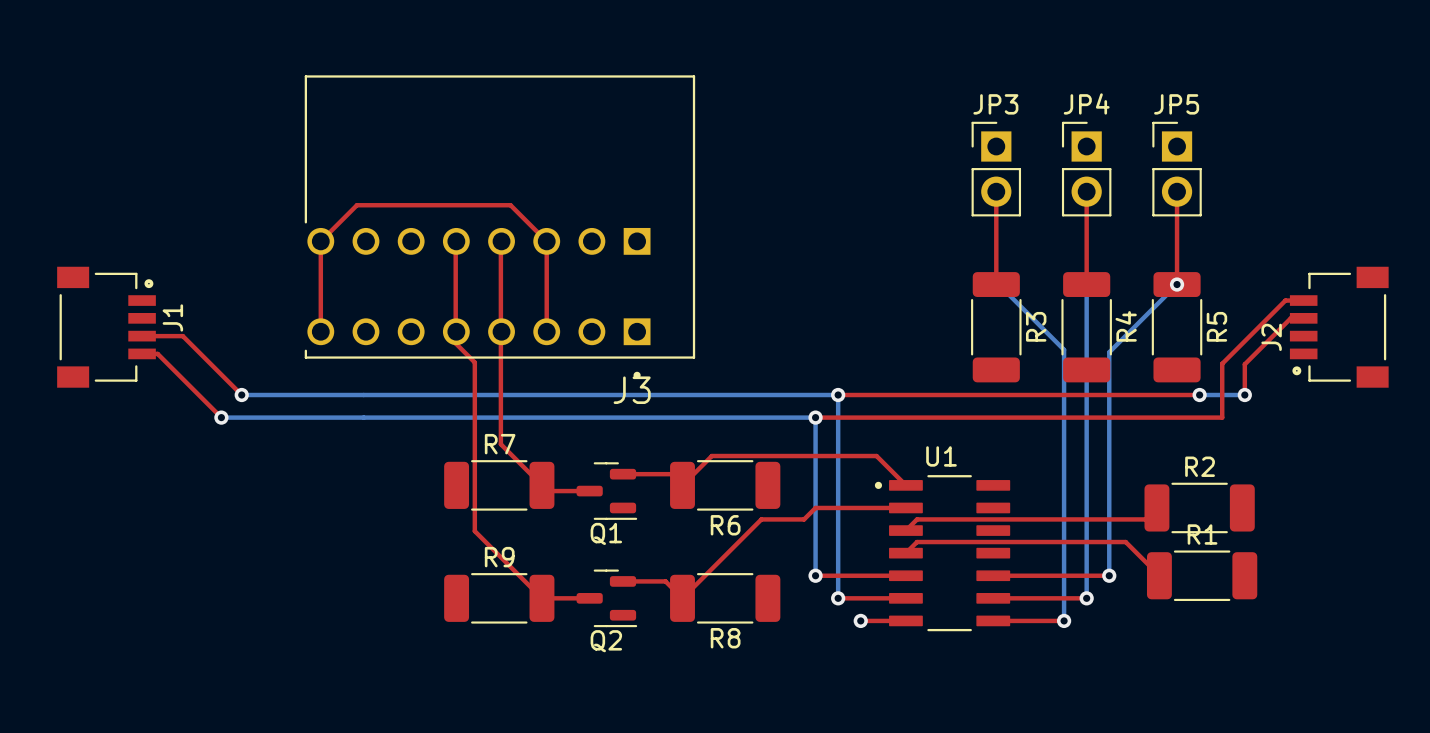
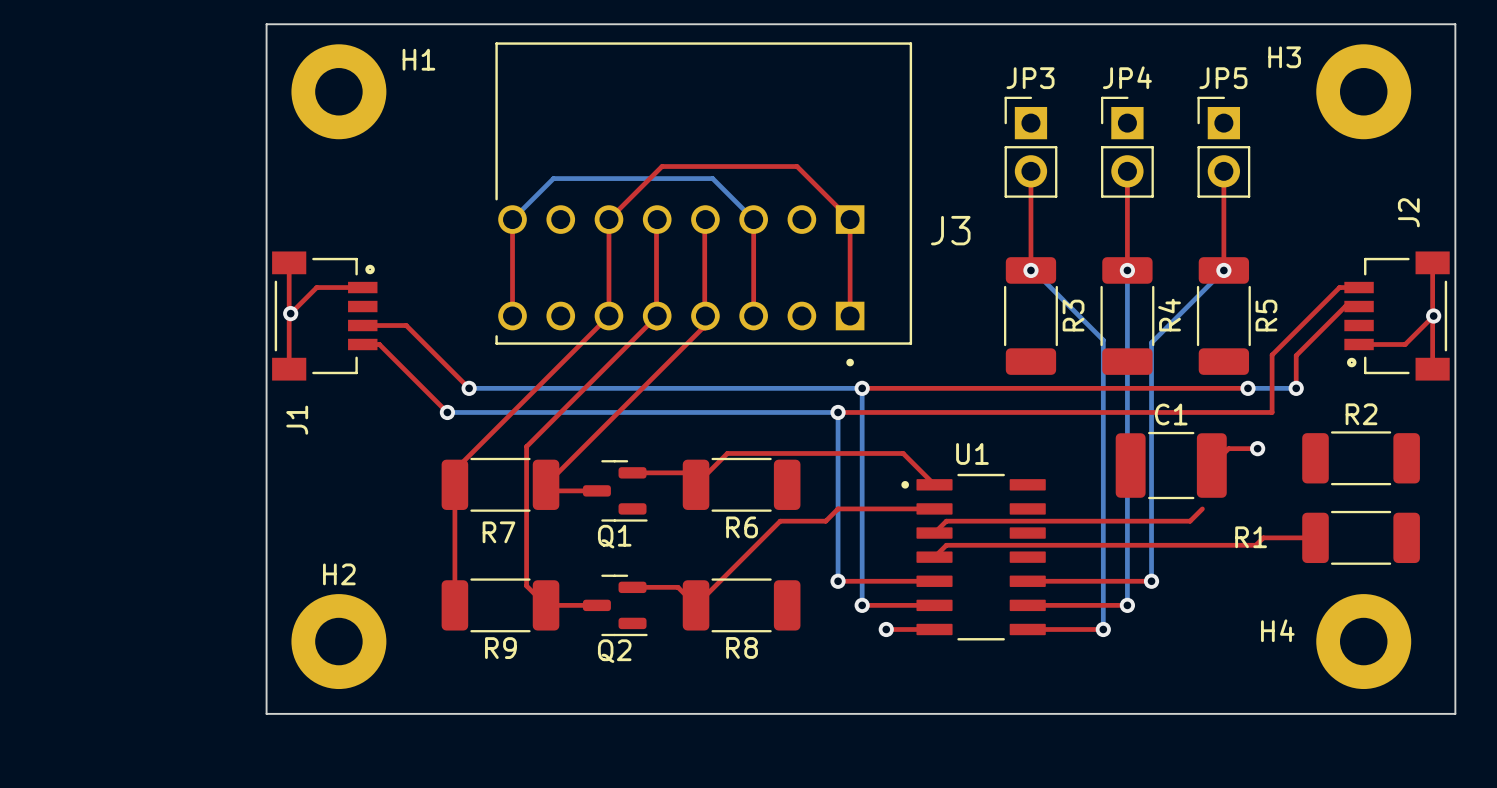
board edge: none -> (266, 24) (1455, 24) (1455, 713) (266, 713) (266, 24)
H1: none -> (338, 91)
H3: none -> (1363, 91)
J3 position: (499, 227) -> (703, 204)
top track: none -> (512, 219) (512, 316)
bottom track: none -> (512, 219) (553, 178) (712, 178) (753, 219)
top track: none -> (753, 219) (753, 316)
top track: none -> (656, 231) (656, 328)
top track: none -> (704, 231) (704, 328)
top track: (455, 253) (455, 343) (474, 362) (474, 531) (523, 580) -> (657, 316) (526, 446) (526, 585)
top track: (500, 253) (500, 444) (541, 485) -> (705, 316) (705, 325) (546, 484)
top track: none -> (289, 262) (290, 313)
top track: none -> (1432, 262) (1433, 316) (1405, 344) (1359, 344)
via: none -> (1030, 270)
via: none -> (1127, 270)
top track: none -> (362, 287) (316, 287) (289, 315) (289, 369)
J1 name position: J1 (172, 317) -> J1 (297, 420)
via: none -> (290, 313)
J1 position: (106, 327) -> (324, 316)
top track: none -> (850, 316) (850, 219) (797, 166) (662, 166) (608, 219) (608, 316) (454, 470) (454, 605)
via: none -> (1433, 316)
top track: none -> (1432, 317) (1432, 369)
top track: (320, 331) (320, 241) (356, 205) (510, 205) (546, 241) (546, 331) -> none
top track: (142, 336) (182, 336) (241, 395) -> (362, 325) (406, 325) (469, 388)
J2 name position: J2 (1271, 337) -> J2 (1408, 212)
top track: (142, 353) (157, 353) (221, 417) -> (362, 344) (379, 344) (447, 412)
J3 name position: J3 (632, 390) -> J3 (950, 230)
bottom track: (241, 395) (469, 395) -> none
via: (241, 395) -> none
via: none -> (469, 388)
bottom track: (221, 417) (449, 417) -> none
via: (221, 417) -> none
via: none -> (447, 412)
R7 name position: R7 (500, 444) -> R7 (498, 532)
top track: none -> (1257, 448) (1228, 448) (1211, 465)
via: none -> (1257, 448)
C1: none -> (1171, 465)
R2 position: (1199, 507) -> (1361, 458)
top track: (1125, 542) (1159, 575) -> (1169, 545) (1255, 545) (1263, 537) (1315, 537)
R9 name position: R9 (499, 557) -> R9 (500, 648)
R1 position: (1202, 575) -> (1361, 537)
H2: none -> (338, 641)
H4: none -> (1363, 641)

